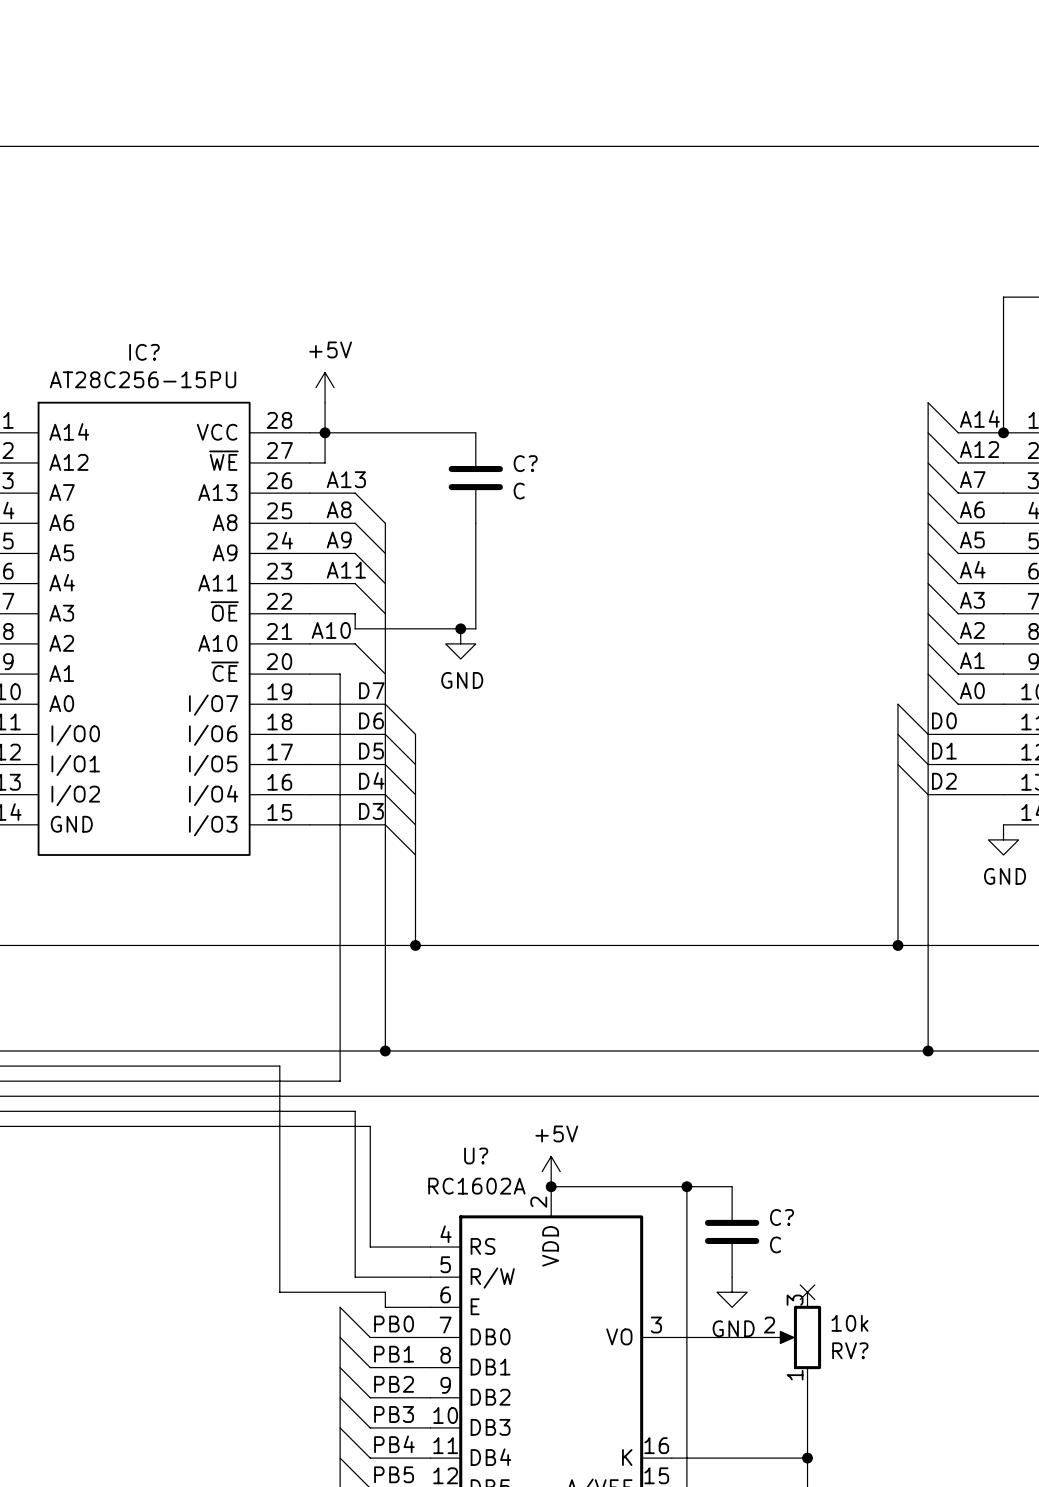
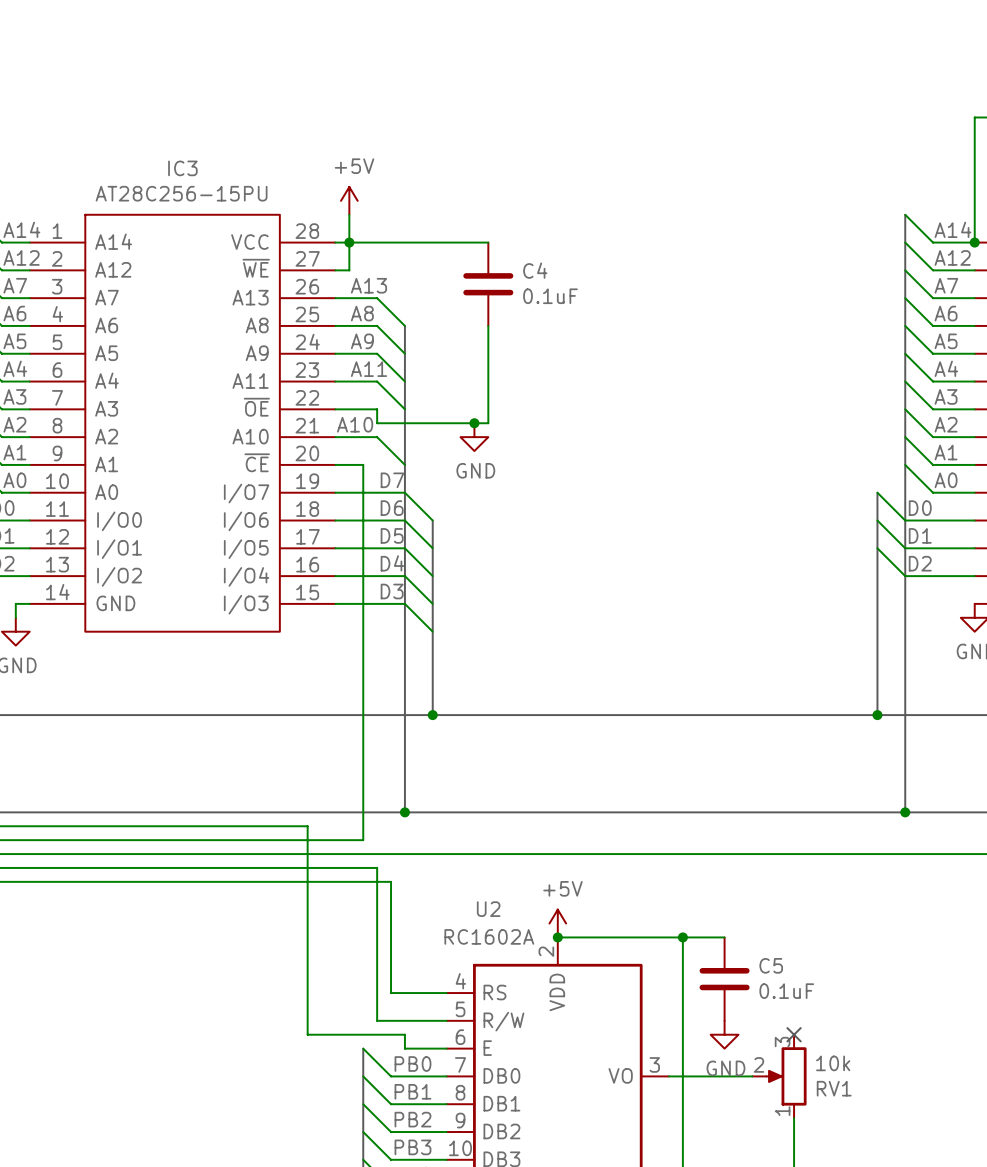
IC? name: IC? (144, 352) -> IC3 (182, 168)
C? name: C? (525, 463) -> C4 (535, 270)
C? value: C (519, 491) -> 0.1uF (550, 296)
U? name: U? (476, 1155) -> U2 (488, 909)
C? name: C? (781, 1217) -> C5 (771, 965)
C? value: C (775, 1244) -> 0.1uF (786, 991)
RV? name: RV? (850, 1350) -> RV1 (834, 1088)

